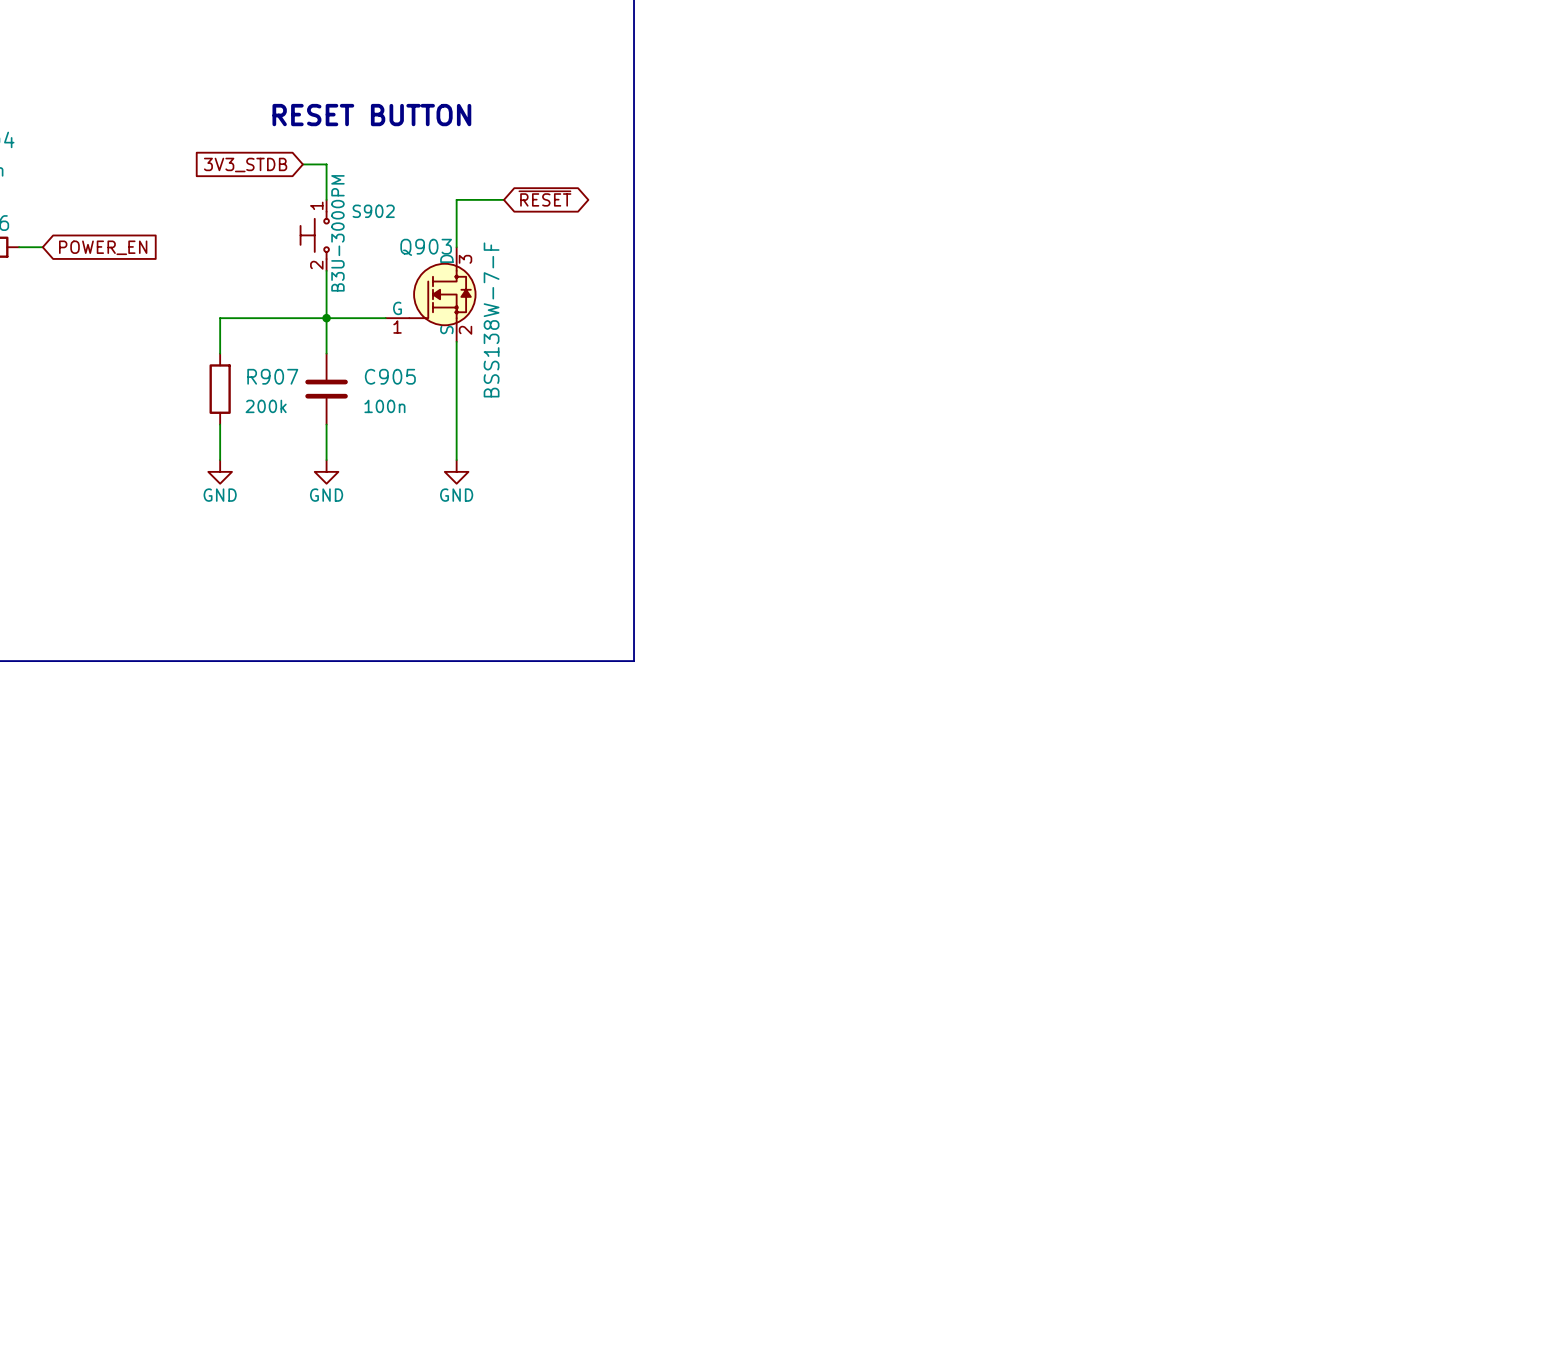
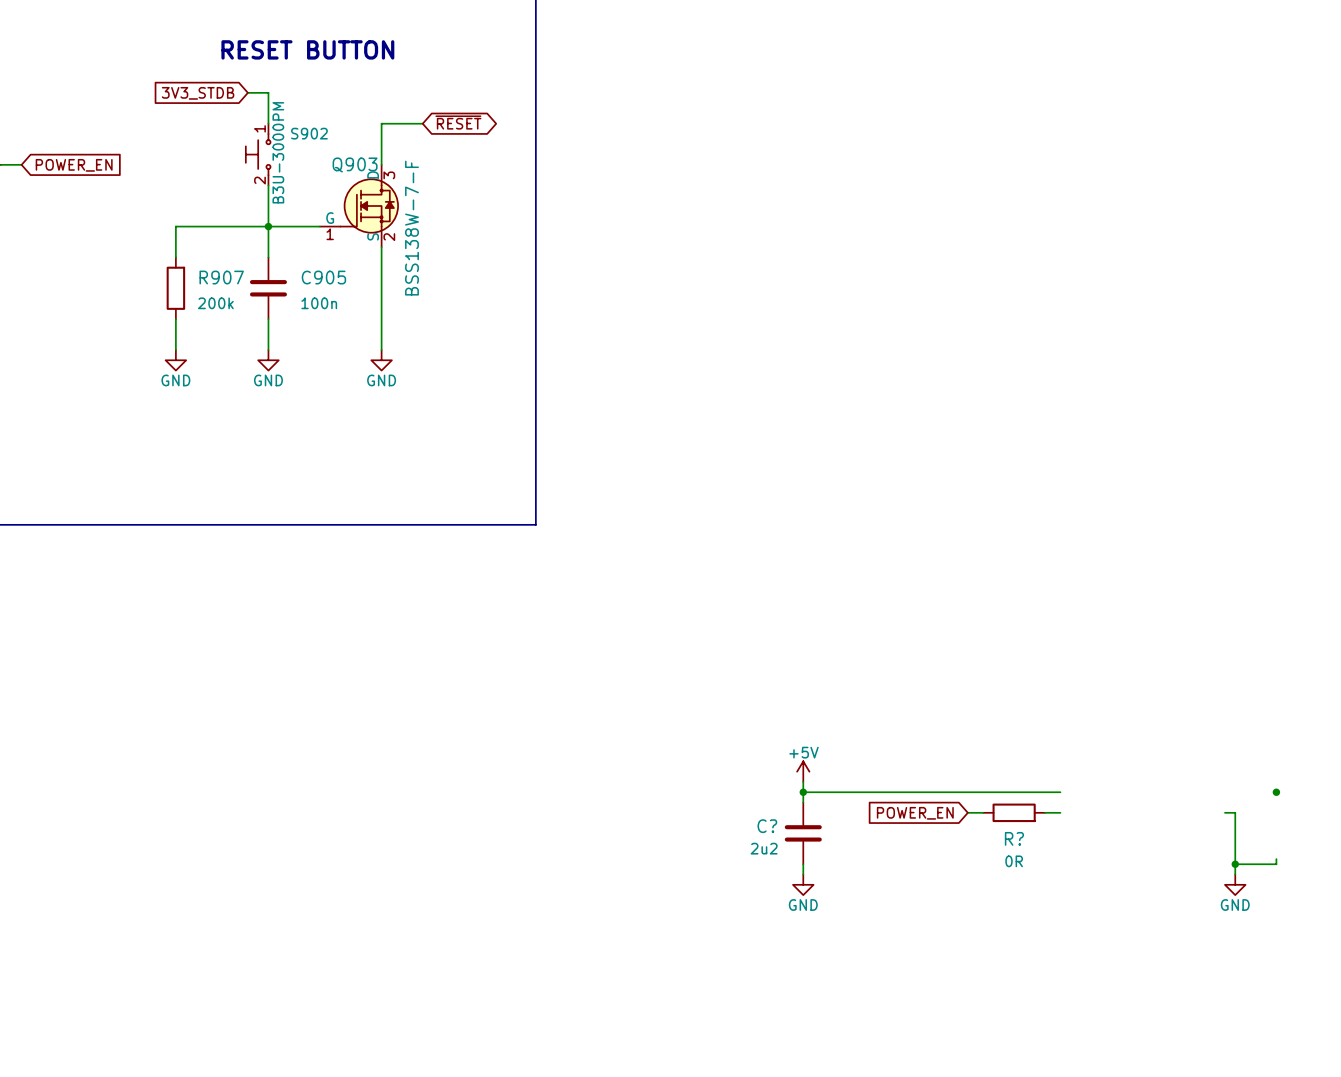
power symbol: none -> +5V (803, 771)
wire: none -> (803, 781) (803, 802)
wire: none -> (803, 792) (1060, 792)
junction: none -> (803, 792)
junction: none -> (1276, 792)
global label: none -> POWER_EN (915, 813)
wire: none -> (967, 812) (983, 812)
R?: none -> (1014, 812)
wire: none -> (1044, 812) (1060, 812)
wire: none -> (1224, 812) (1235, 812) (1235, 874)
C?: none -> (803, 833)
wire: none -> (1276, 859) (1276, 864) (1235, 864)
wire: none -> (803, 864) (803, 874)
junction: none -> (1235, 864)
power symbol: none -> GND (803, 884)
power symbol: none -> GND (1235, 884)

